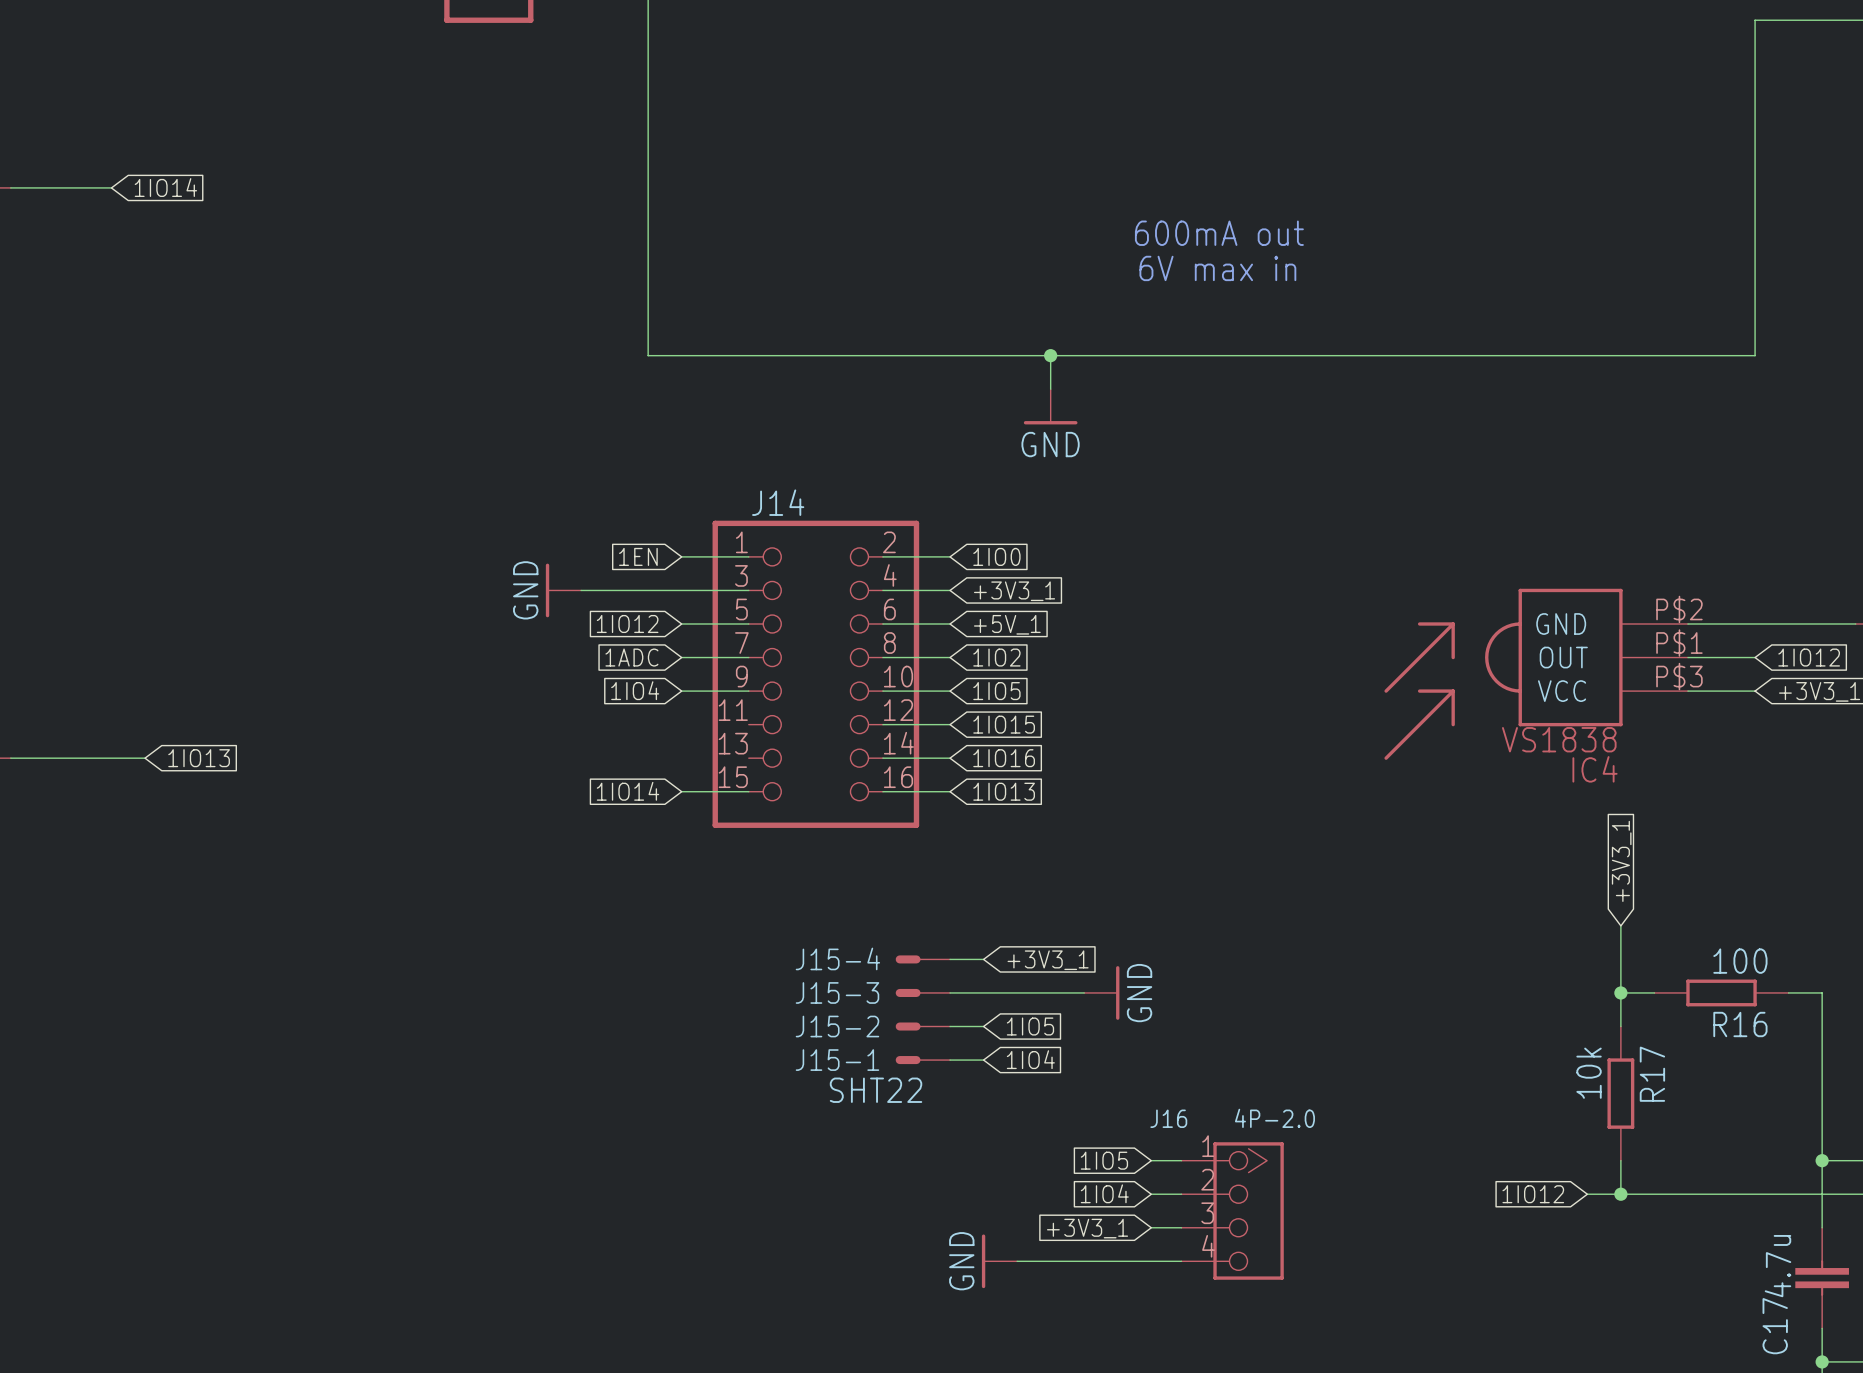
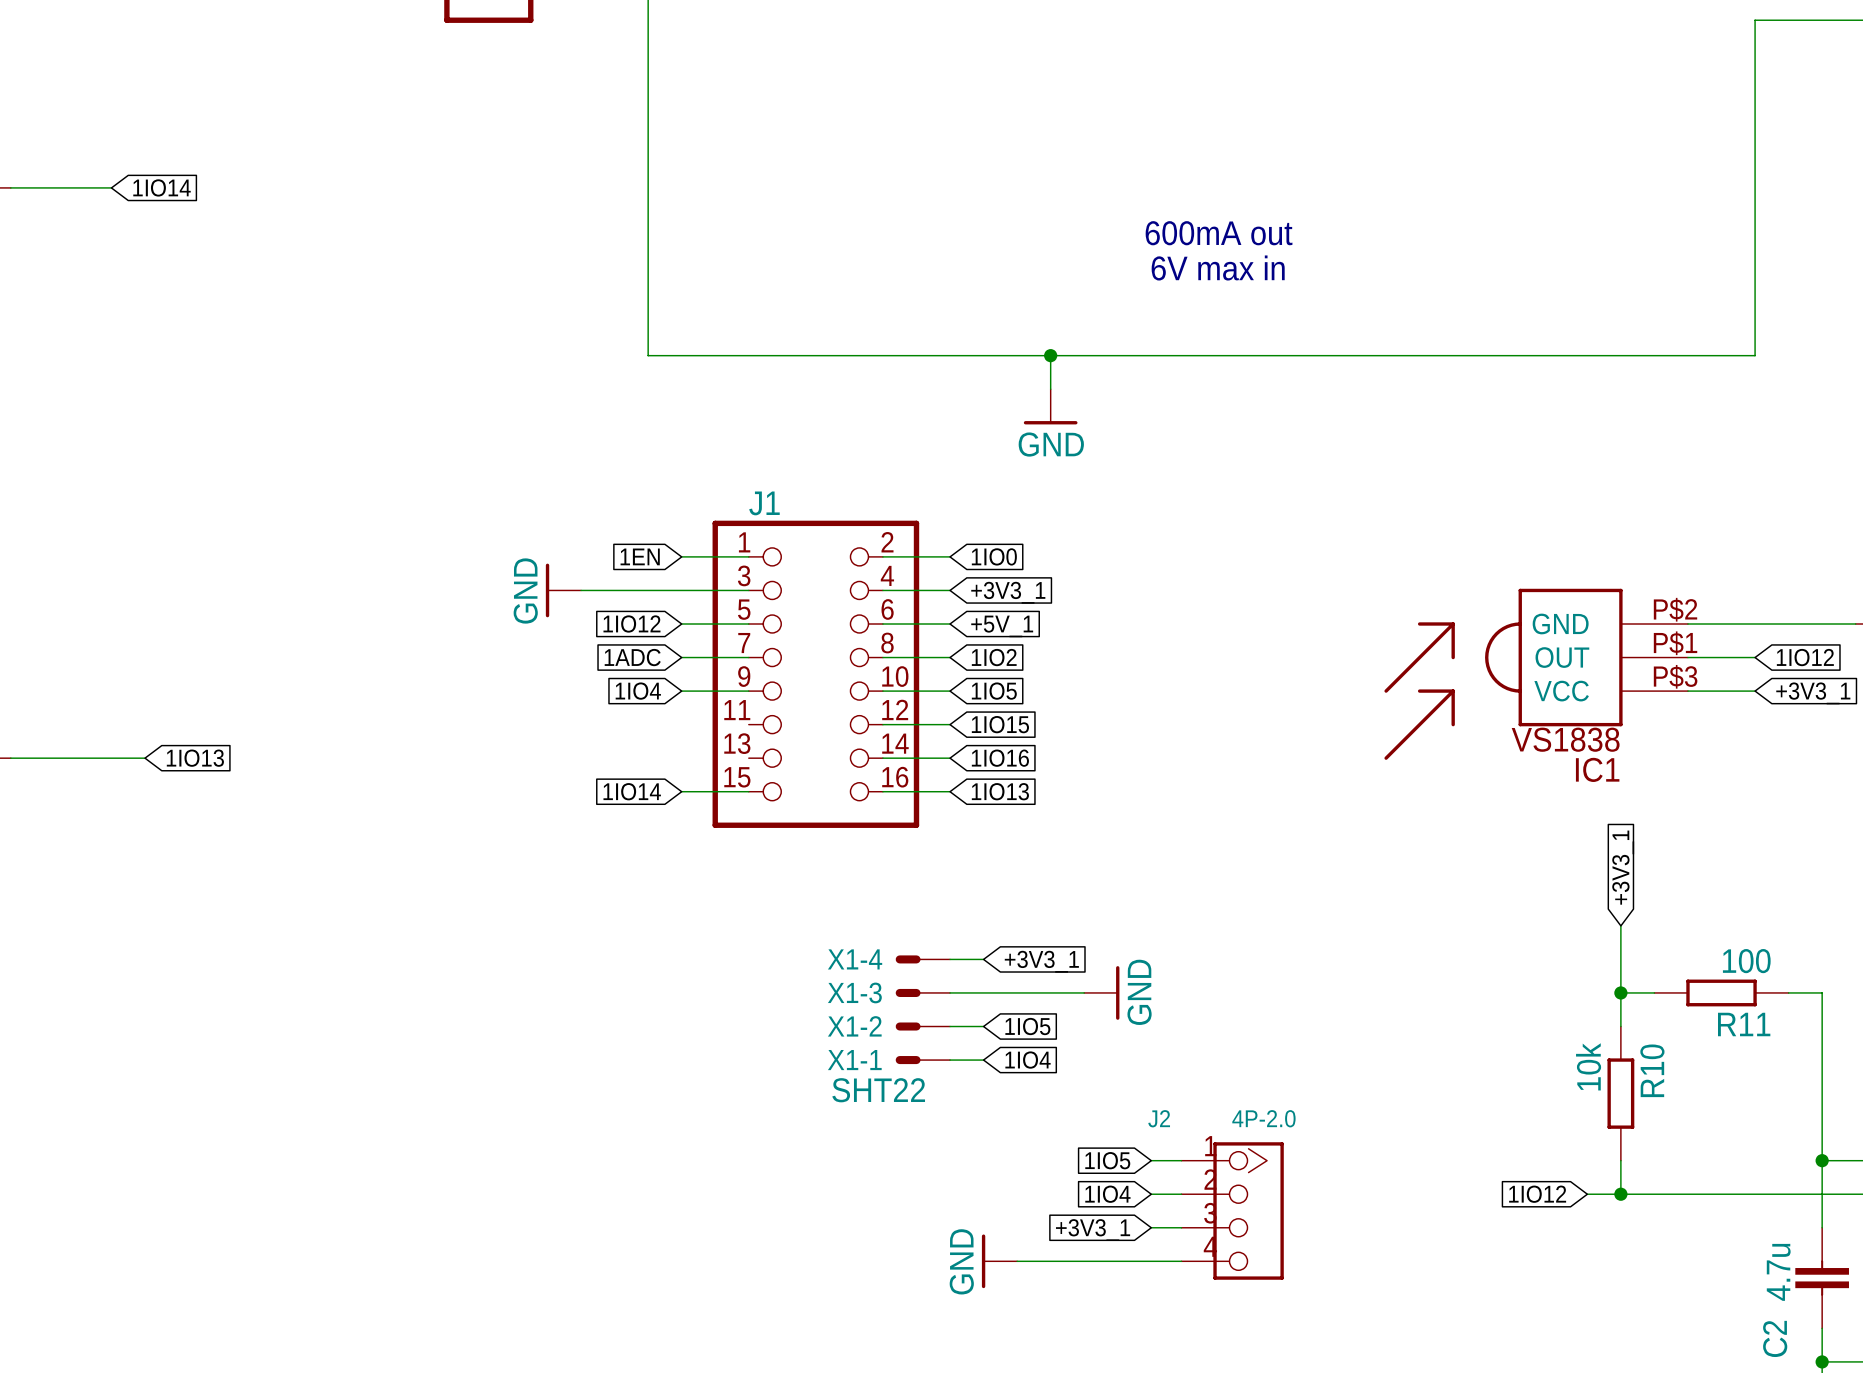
J14 name: J14 (778, 502) -> J1 (764, 503)
IC4 name: IC4 (1595, 769) -> IC1 (1597, 769)
J15-4 name: J15-4 (837, 958) -> X1-4 (855, 959)
J15-3 name: J15-3 (837, 992) -> X1-3 (854, 992)
R16 name: R16 (1740, 1024) -> R11 (1744, 1024)
J15-2 name: J15-2 (837, 1026) -> X1-2 (854, 1026)
J15-1 name: J15-1 (837, 1060) -> X1-1 (854, 1060)
R17 name: R17 (1652, 1074) -> R10 (1652, 1070)
J16 name: J16 (1168, 1118) -> J2 (1159, 1118)
C17 name: C17 (1775, 1326) -> C2 (1775, 1338)

